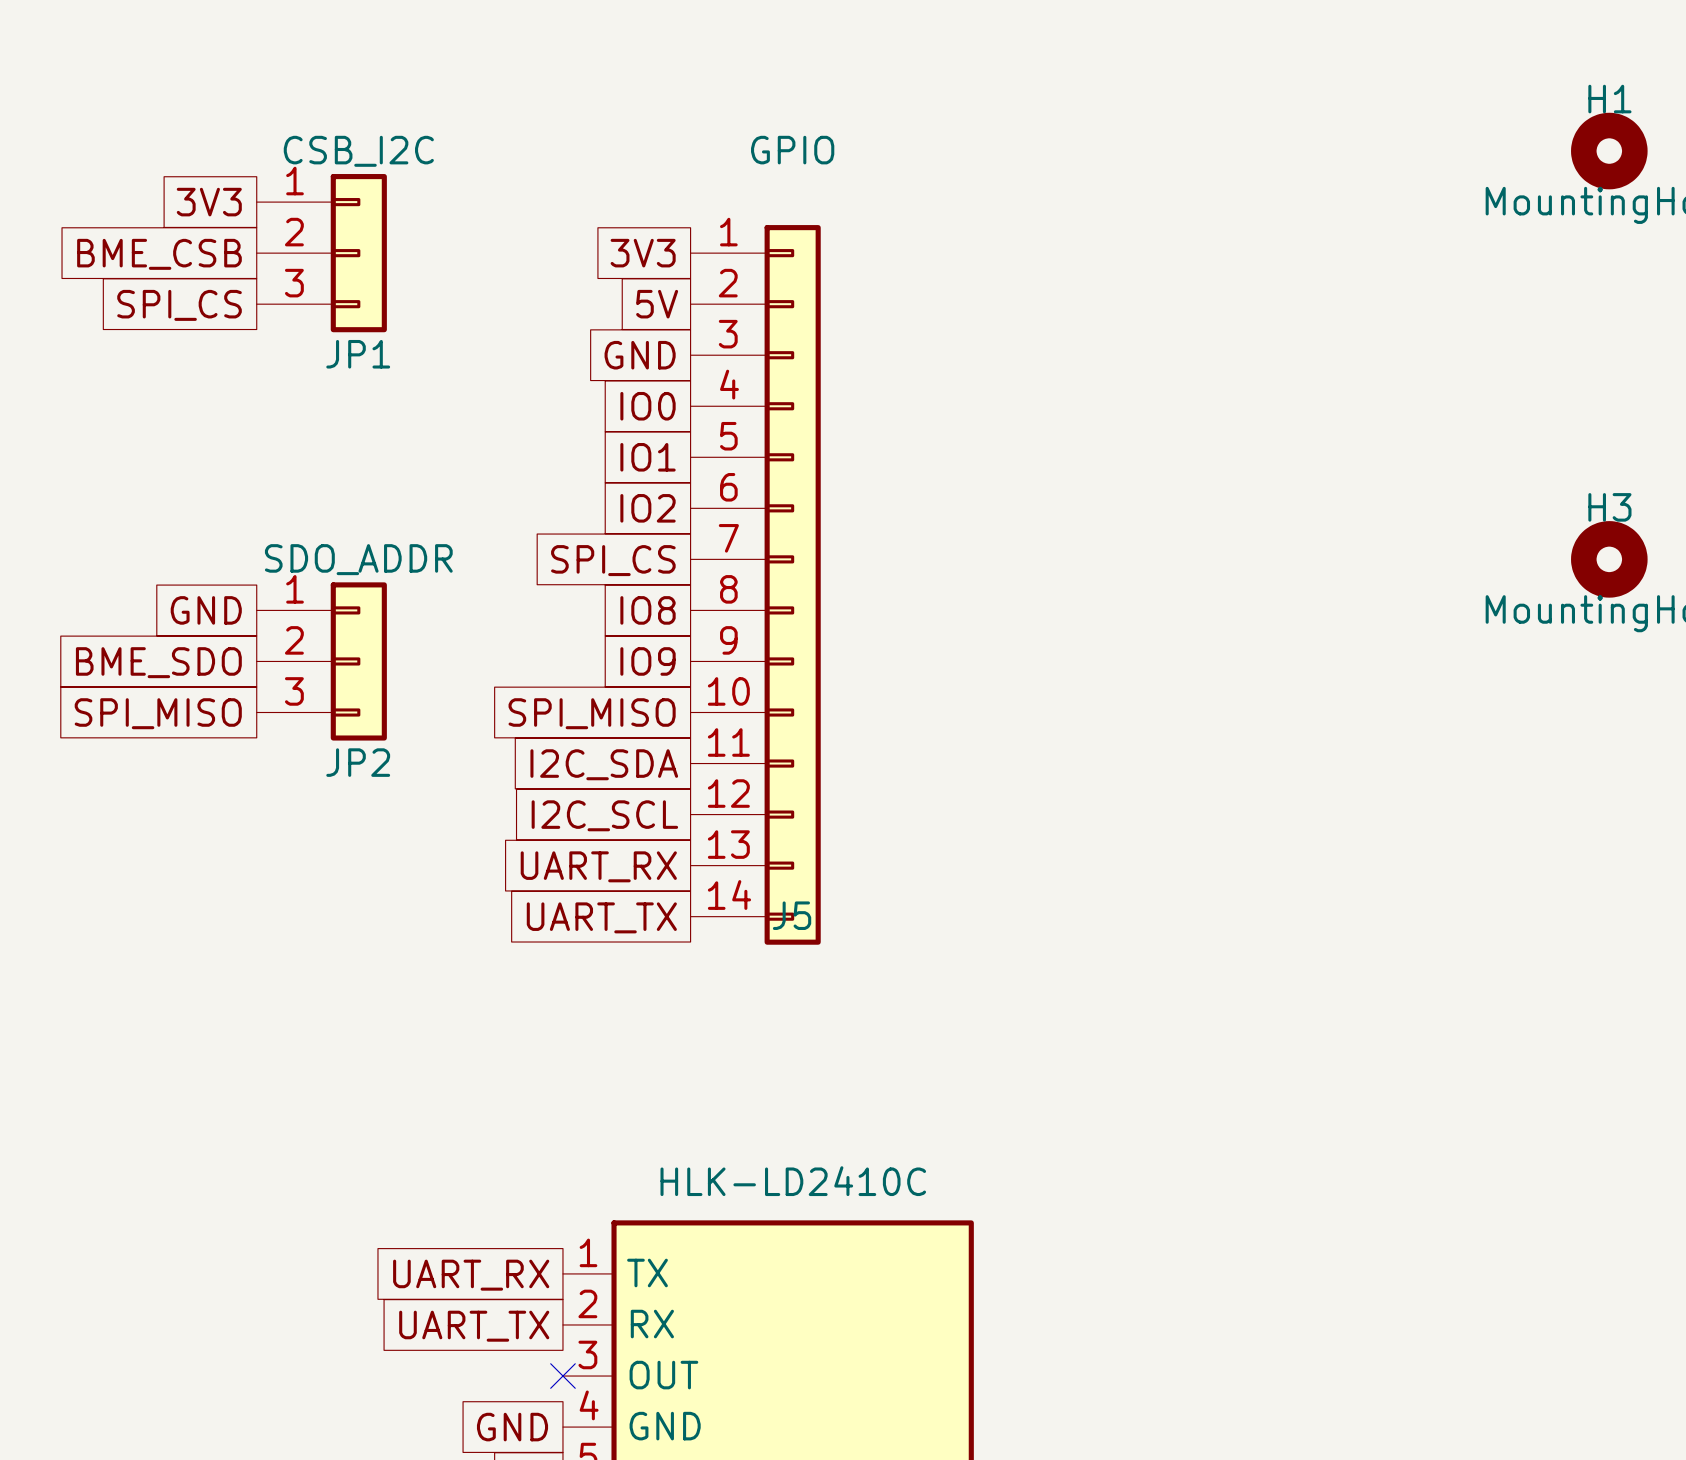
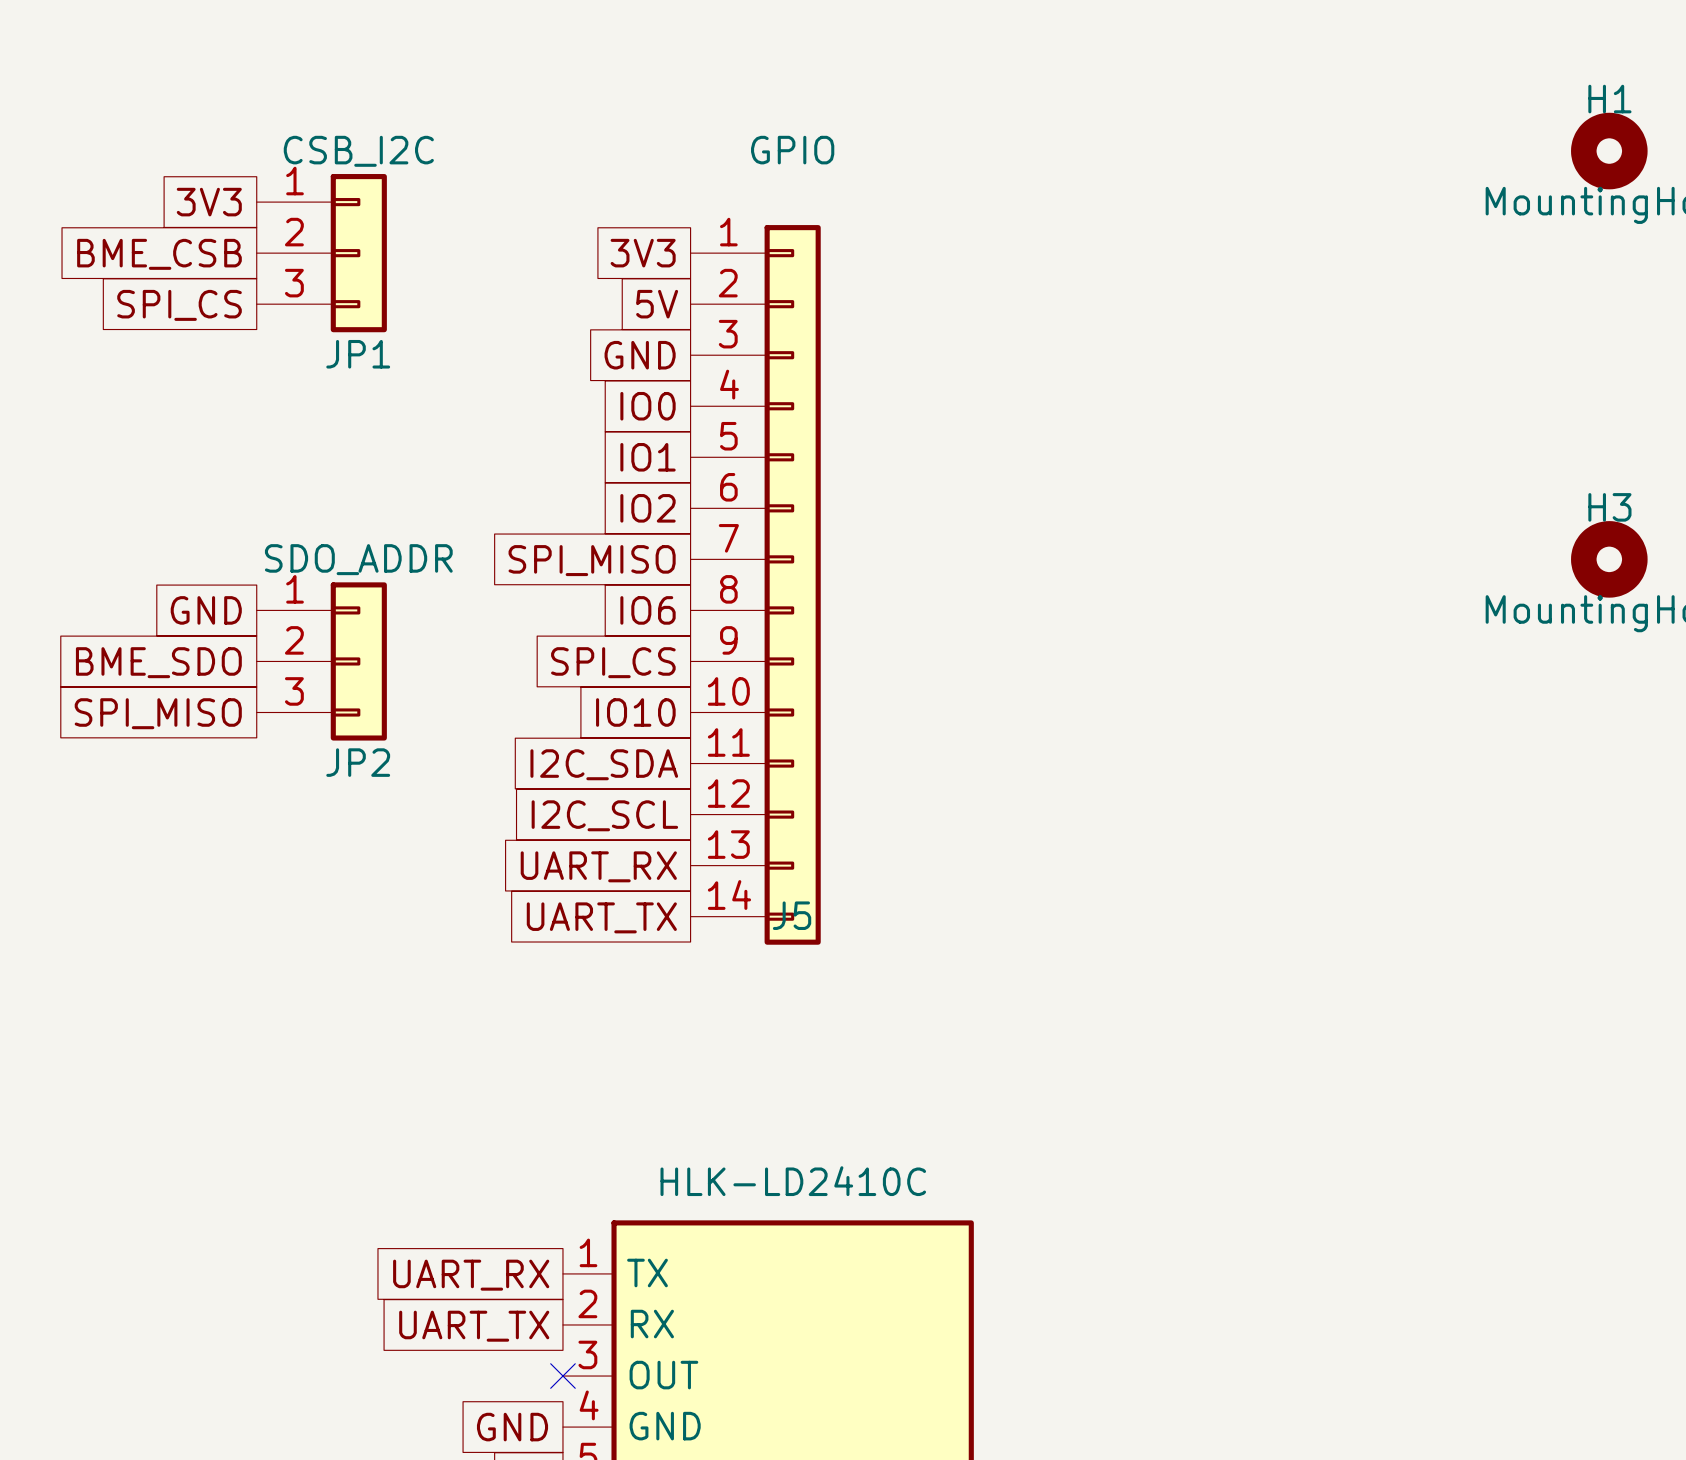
global label: SPI_CS (613, 560) -> SPI_MISO (592, 560)
global label: IO8 (648, 610) -> IO6 (648, 610)
global label: IO9 (648, 661) -> SPI_CS (613, 662)
global label: SPI_MISO (592, 713) -> IO10 (635, 712)

